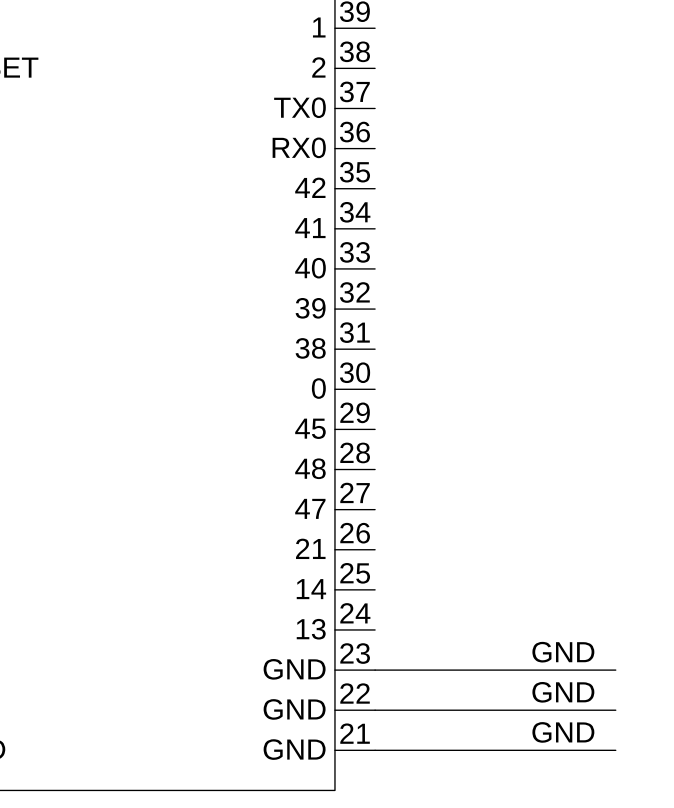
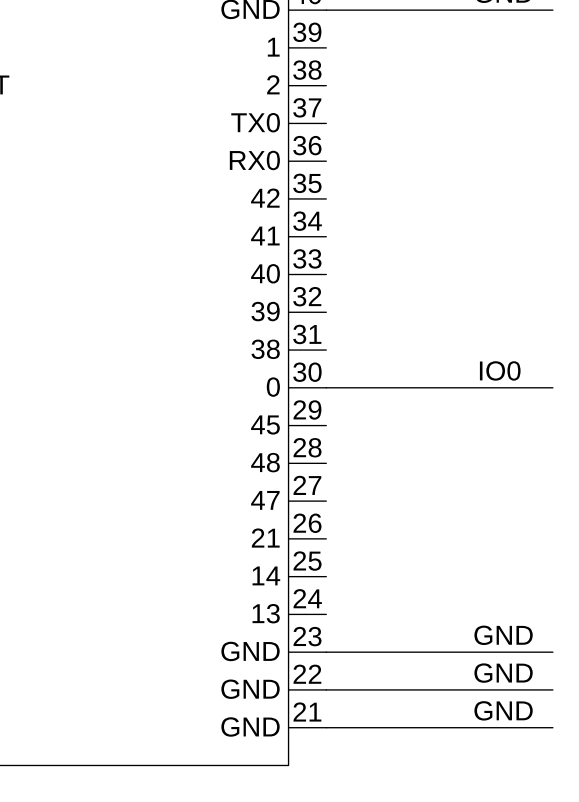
label: none -> IO0 (500, 370)
wire: none -> (326, 387) (552, 387)

